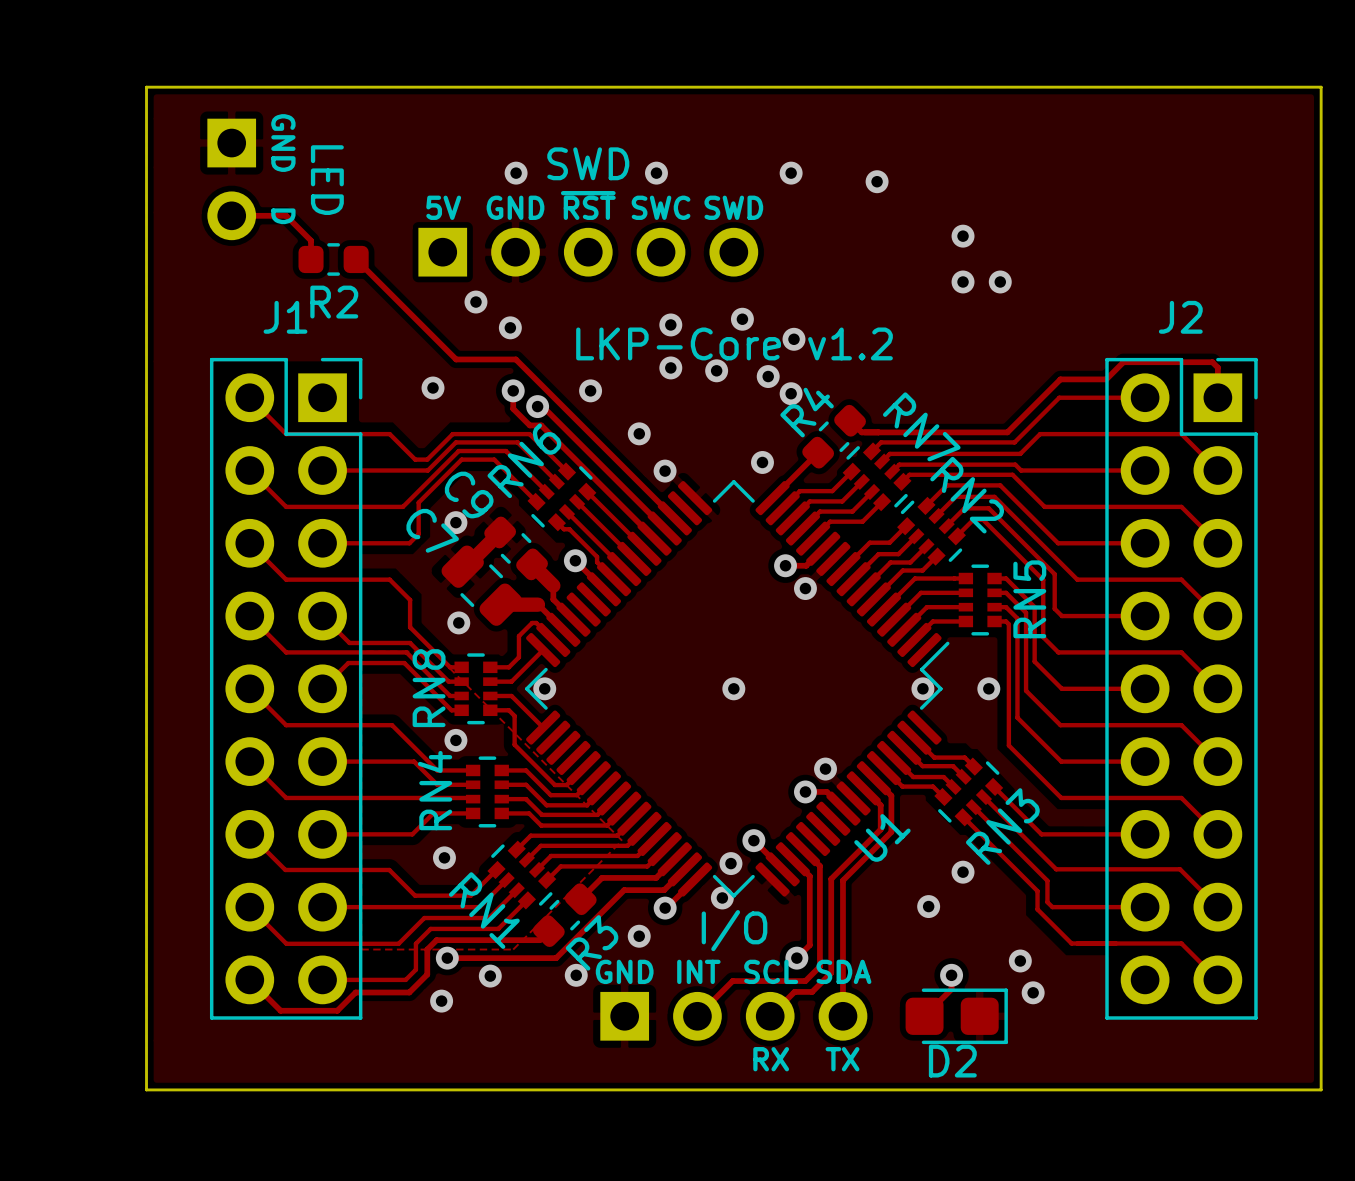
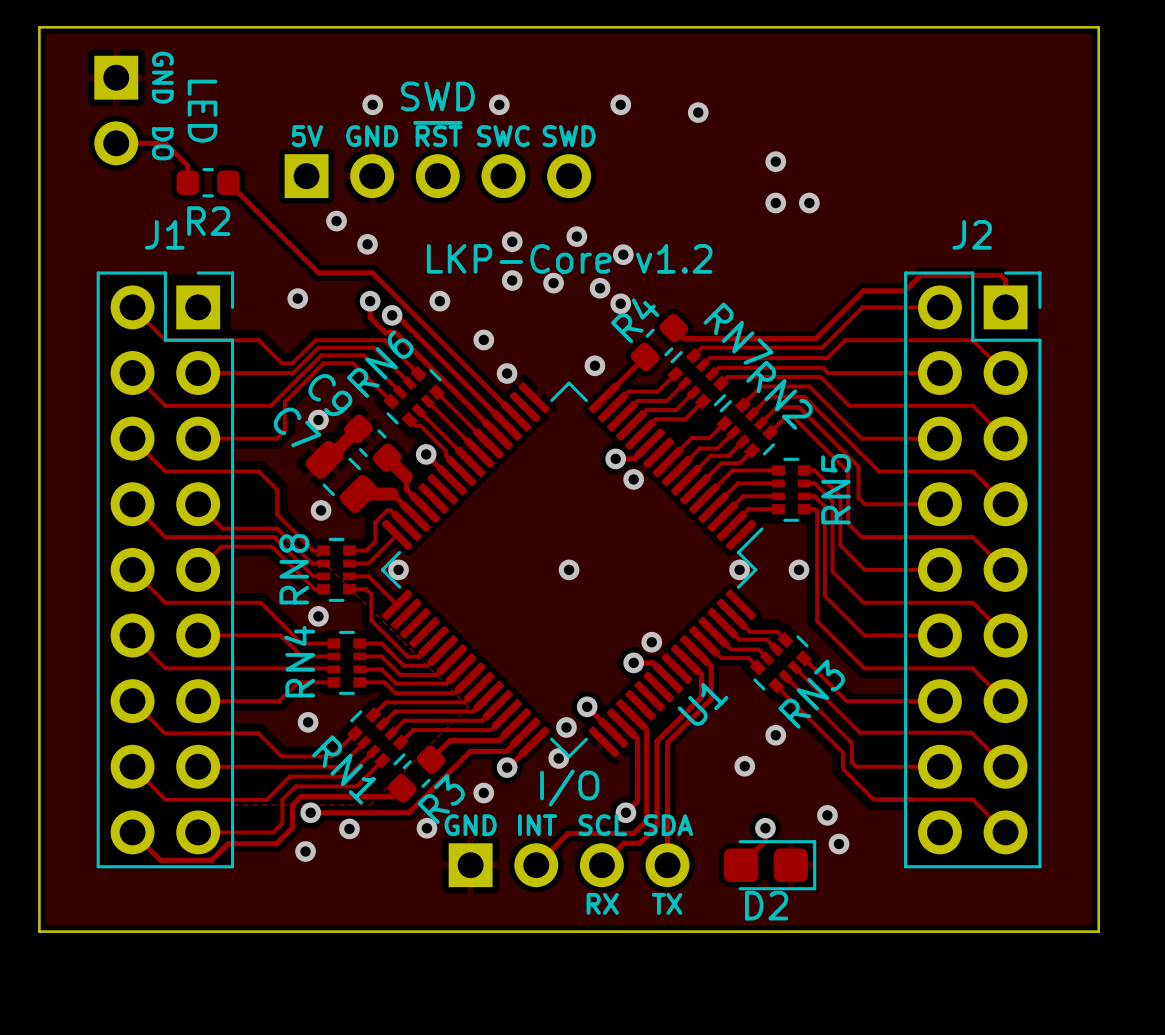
text: D (283, 216) -> DO (162, 143)

